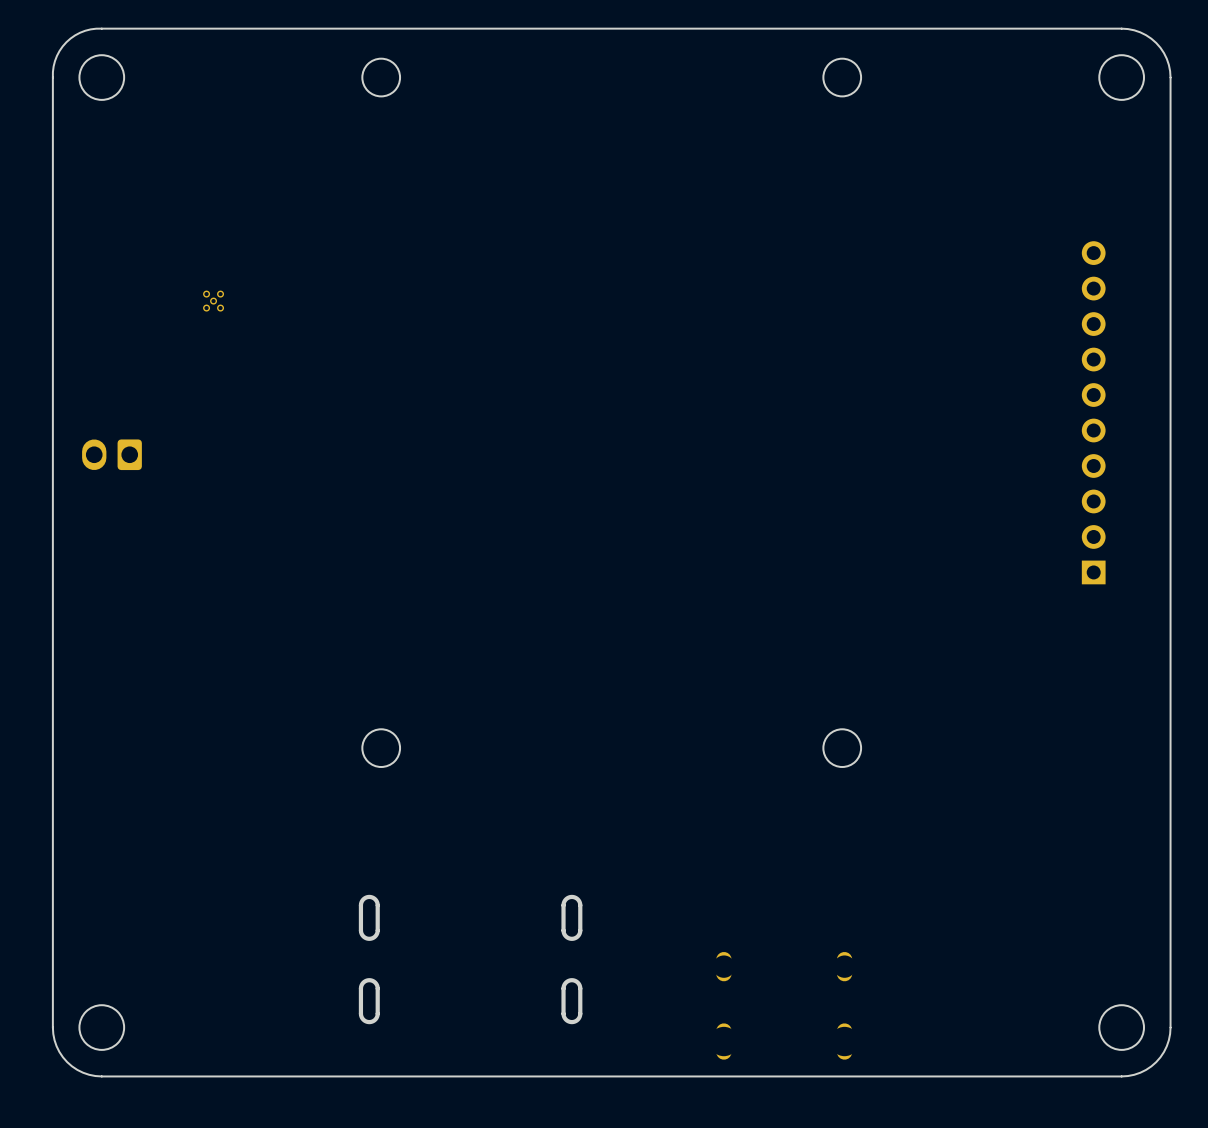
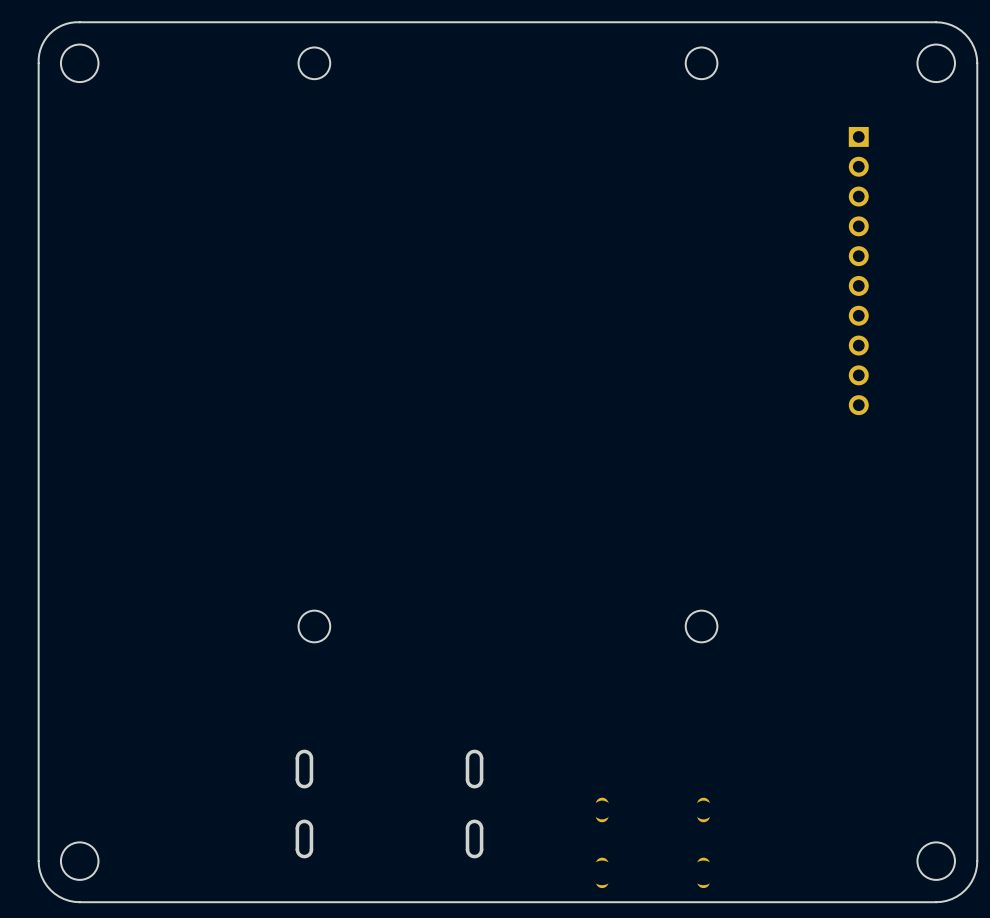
part: (213, 301) -> none
part rotation: 0° (1093, 412) -> 180° (858, 271)
part: (111, 454) -> none

